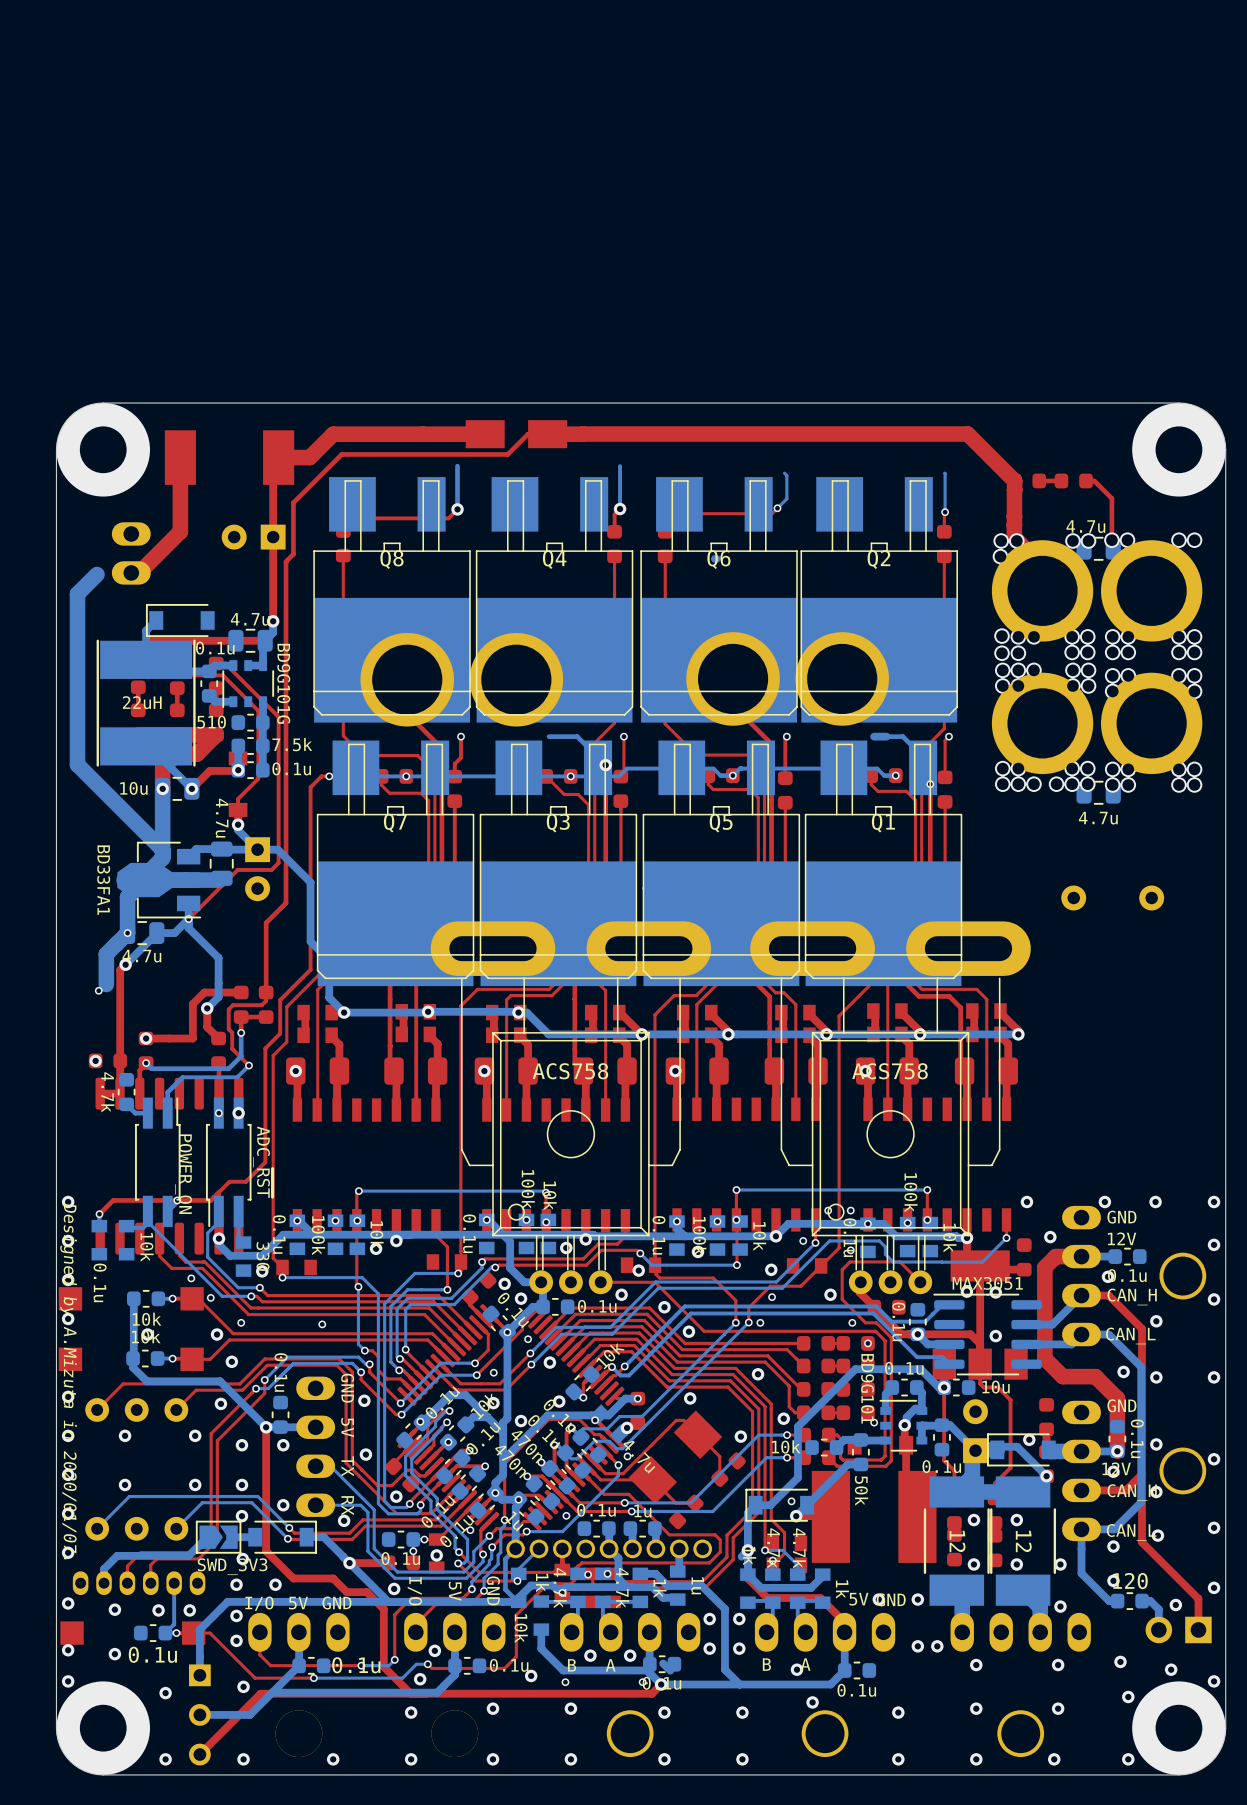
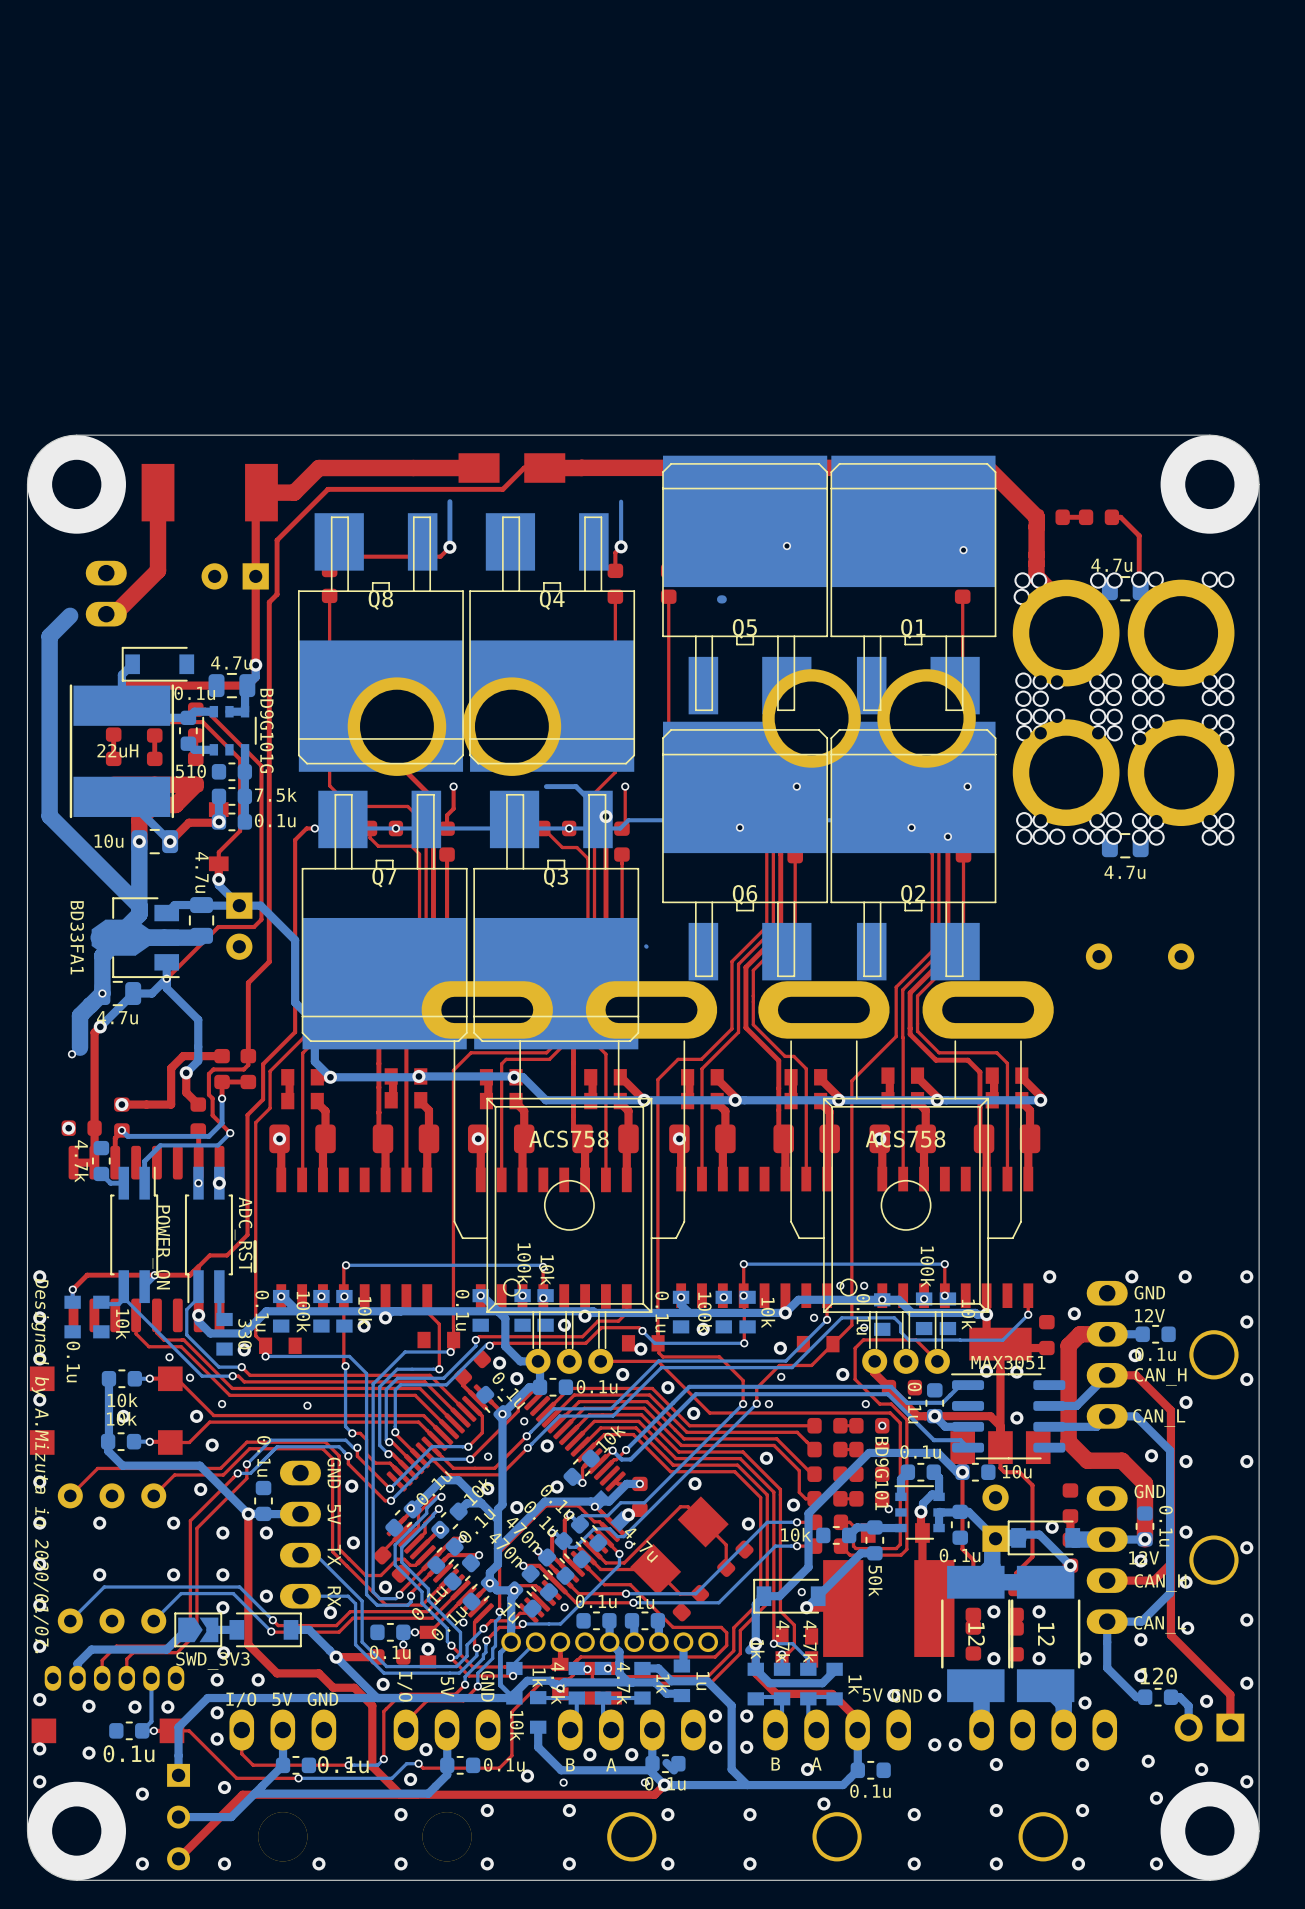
Q6 rotation: 0° (719, 599) -> 180° (745, 851)
Q6 position: (719, 599) -> (745, 851)
Q2 rotation: 0° (879, 599) -> 180° (913, 851)
Q2 position: (879, 599) -> (913, 851)
part position: (787, 678) -> (869, 718)
Q5 rotation: 0° (721, 863) -> 180° (745, 585)
Q5 position: (721, 863) -> (745, 585)
Q1 rotation: 0° (883, 863) -> 180° (913, 585)
Q1 position: (883, 863) -> (913, 585)

